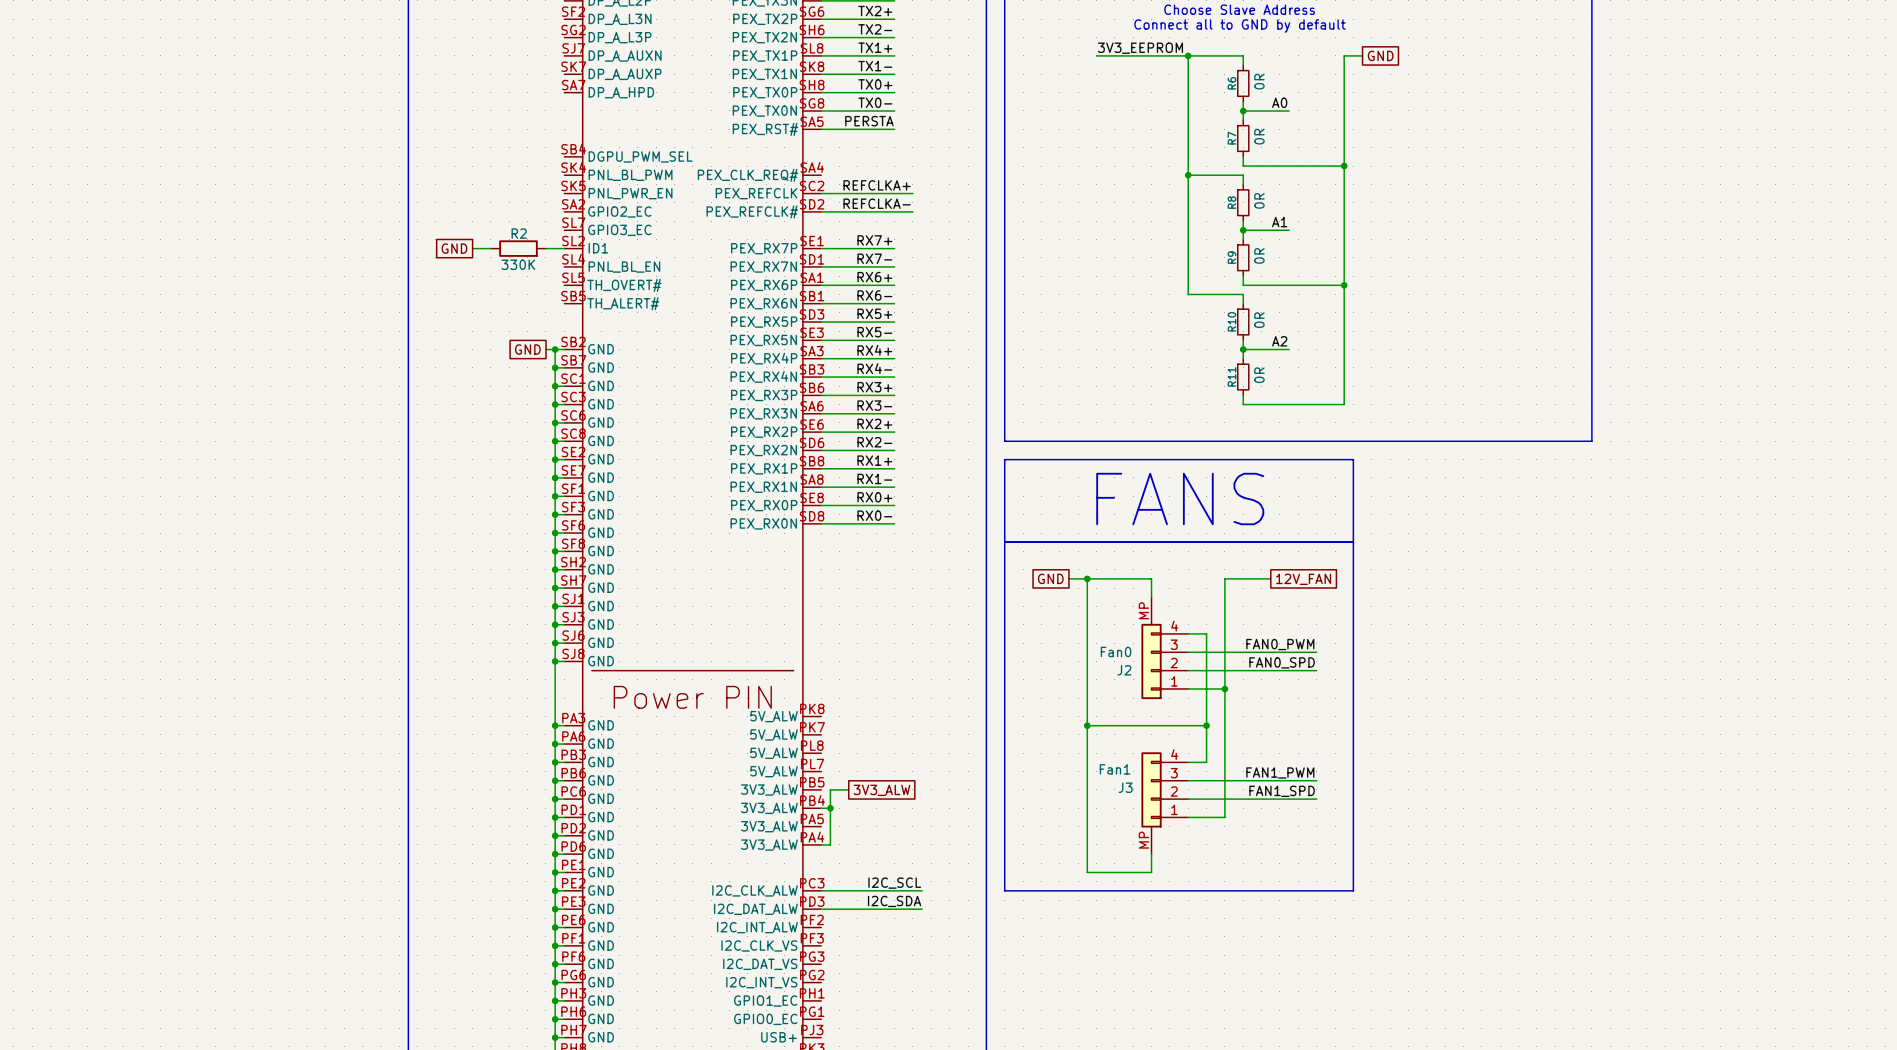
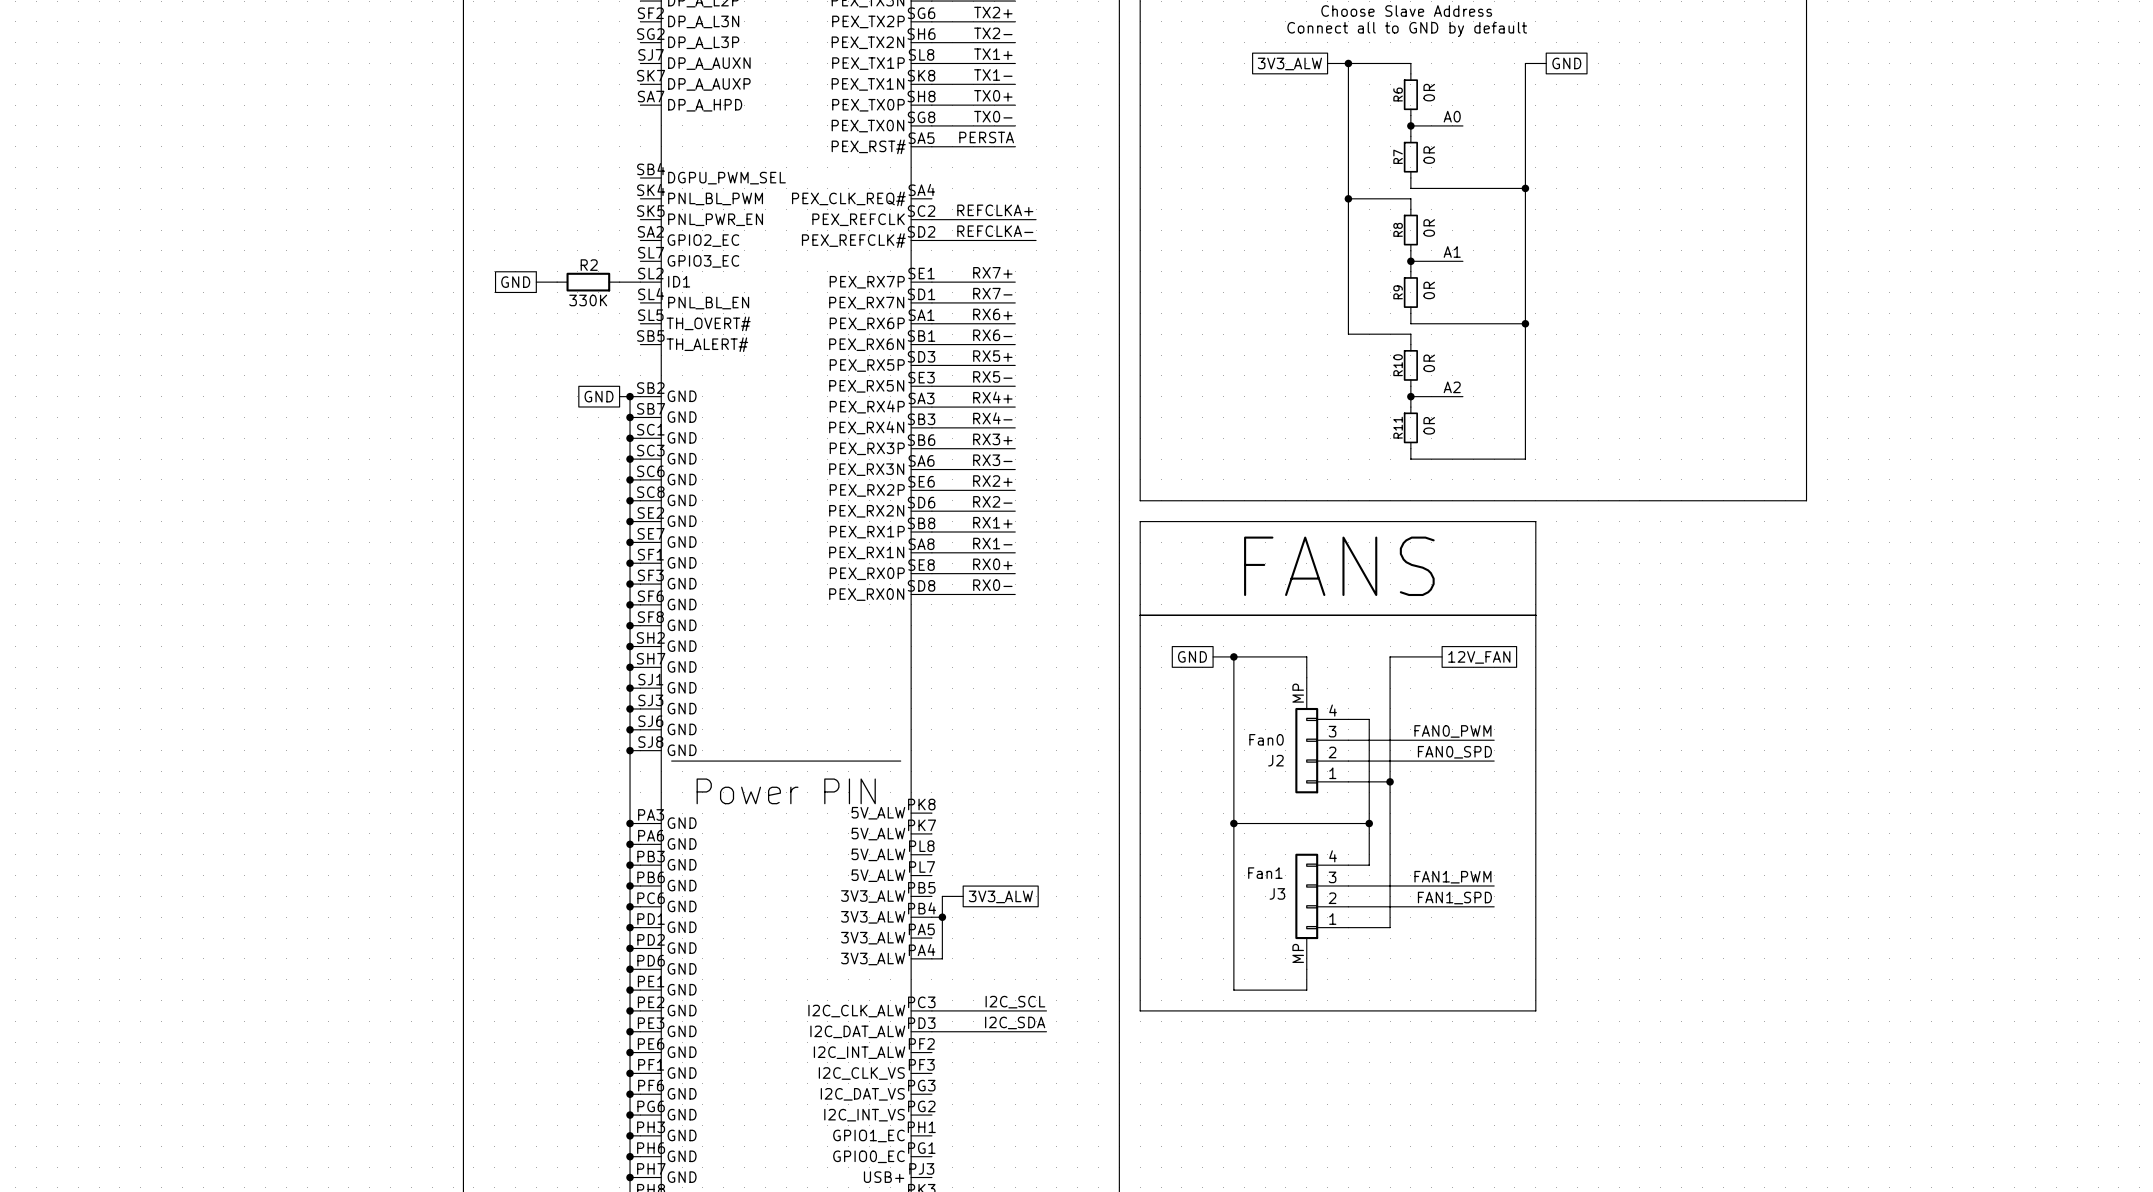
label: 3V3_EEPROM (1140, 48) -> none
wire: (1096, 55) (1169, 55) -> none
global label: none -> 3V3_ALW (1289, 63)

